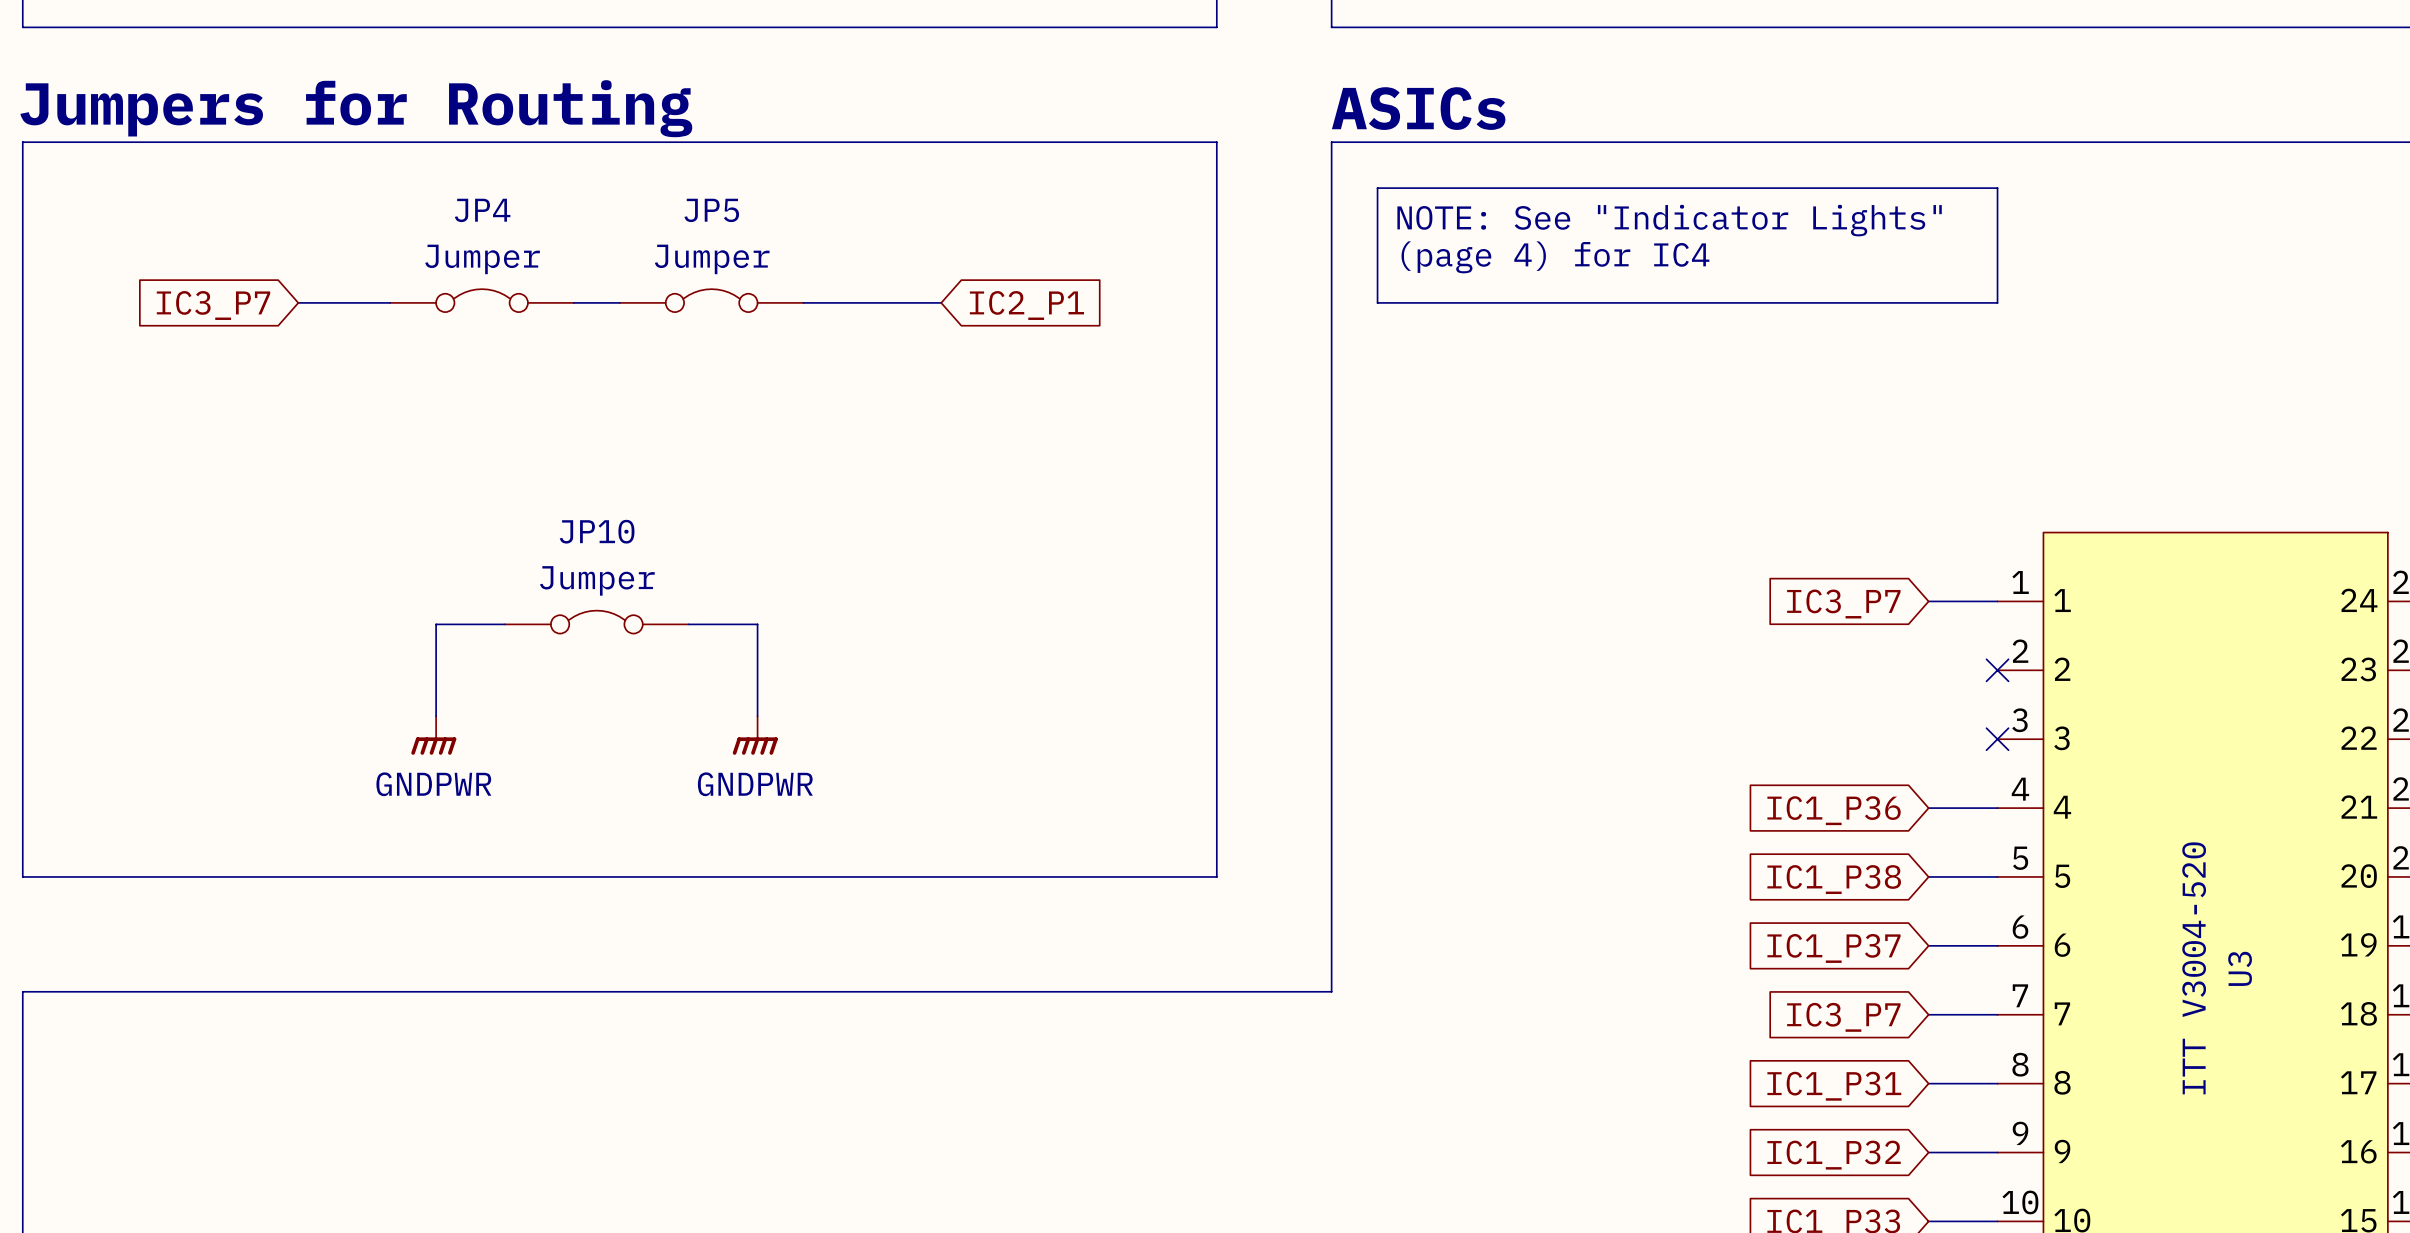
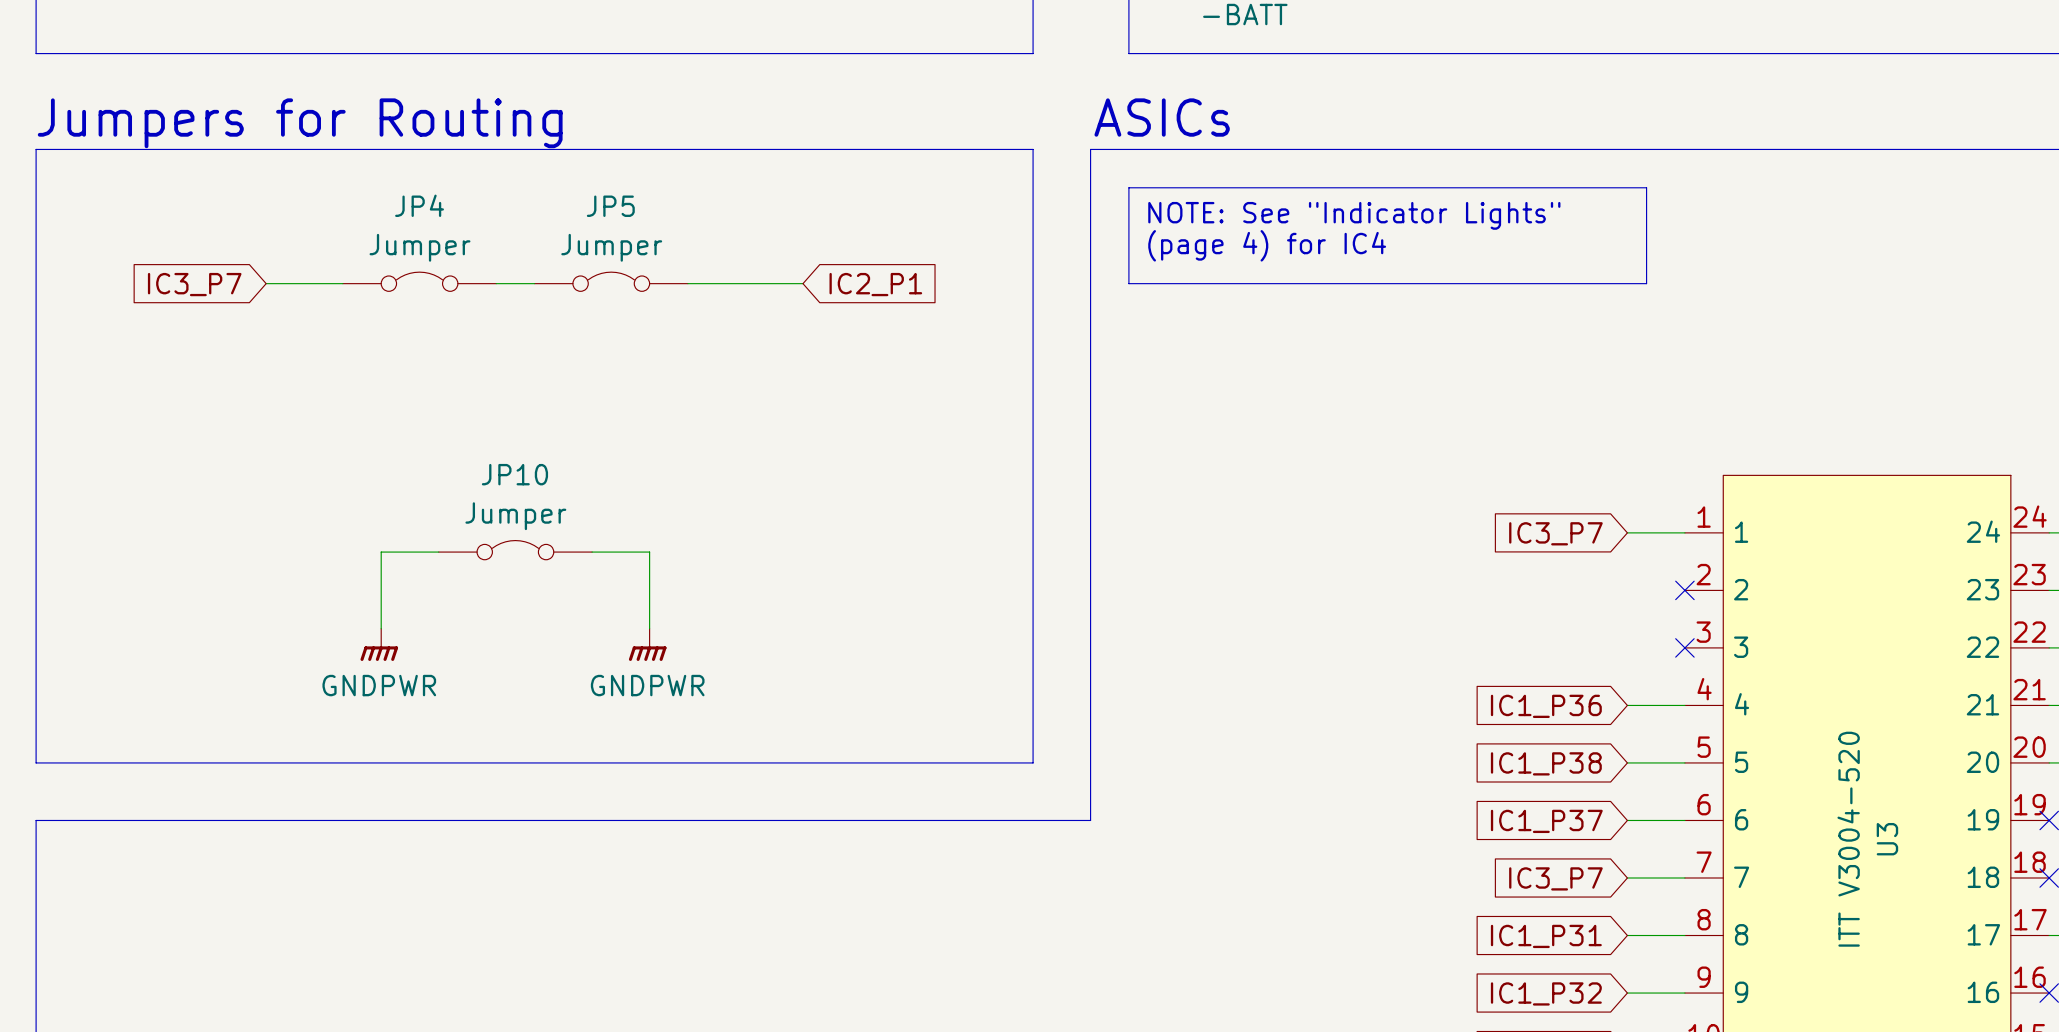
text position: ASICs (1418, 108) -> ASICs (1162, 117)
line: (1331, 142) (1331, 188) -> (1167, 187) (1128, 187)
line: (1377, 188) (1377, 302) -> (1128, 283) (1167, 283)
line: (1951, 188) (1997, 188) (1997, 302) (1951, 302) -> (1646, 187) (1646, 283)
text position: NOTE: See "Indicator Lights" (1669, 220) -> NOTE: See "Indicator Lights" (1354, 215)
text position: (page 4) for IC4 (1555, 257) -> (page 4) for IC4 (1267, 245)
line: (1331, 302) (1331, 991) (22, 991) -> (1128, 149) (1090, 149) (1090, 820) (36, 820) (36, 858)

